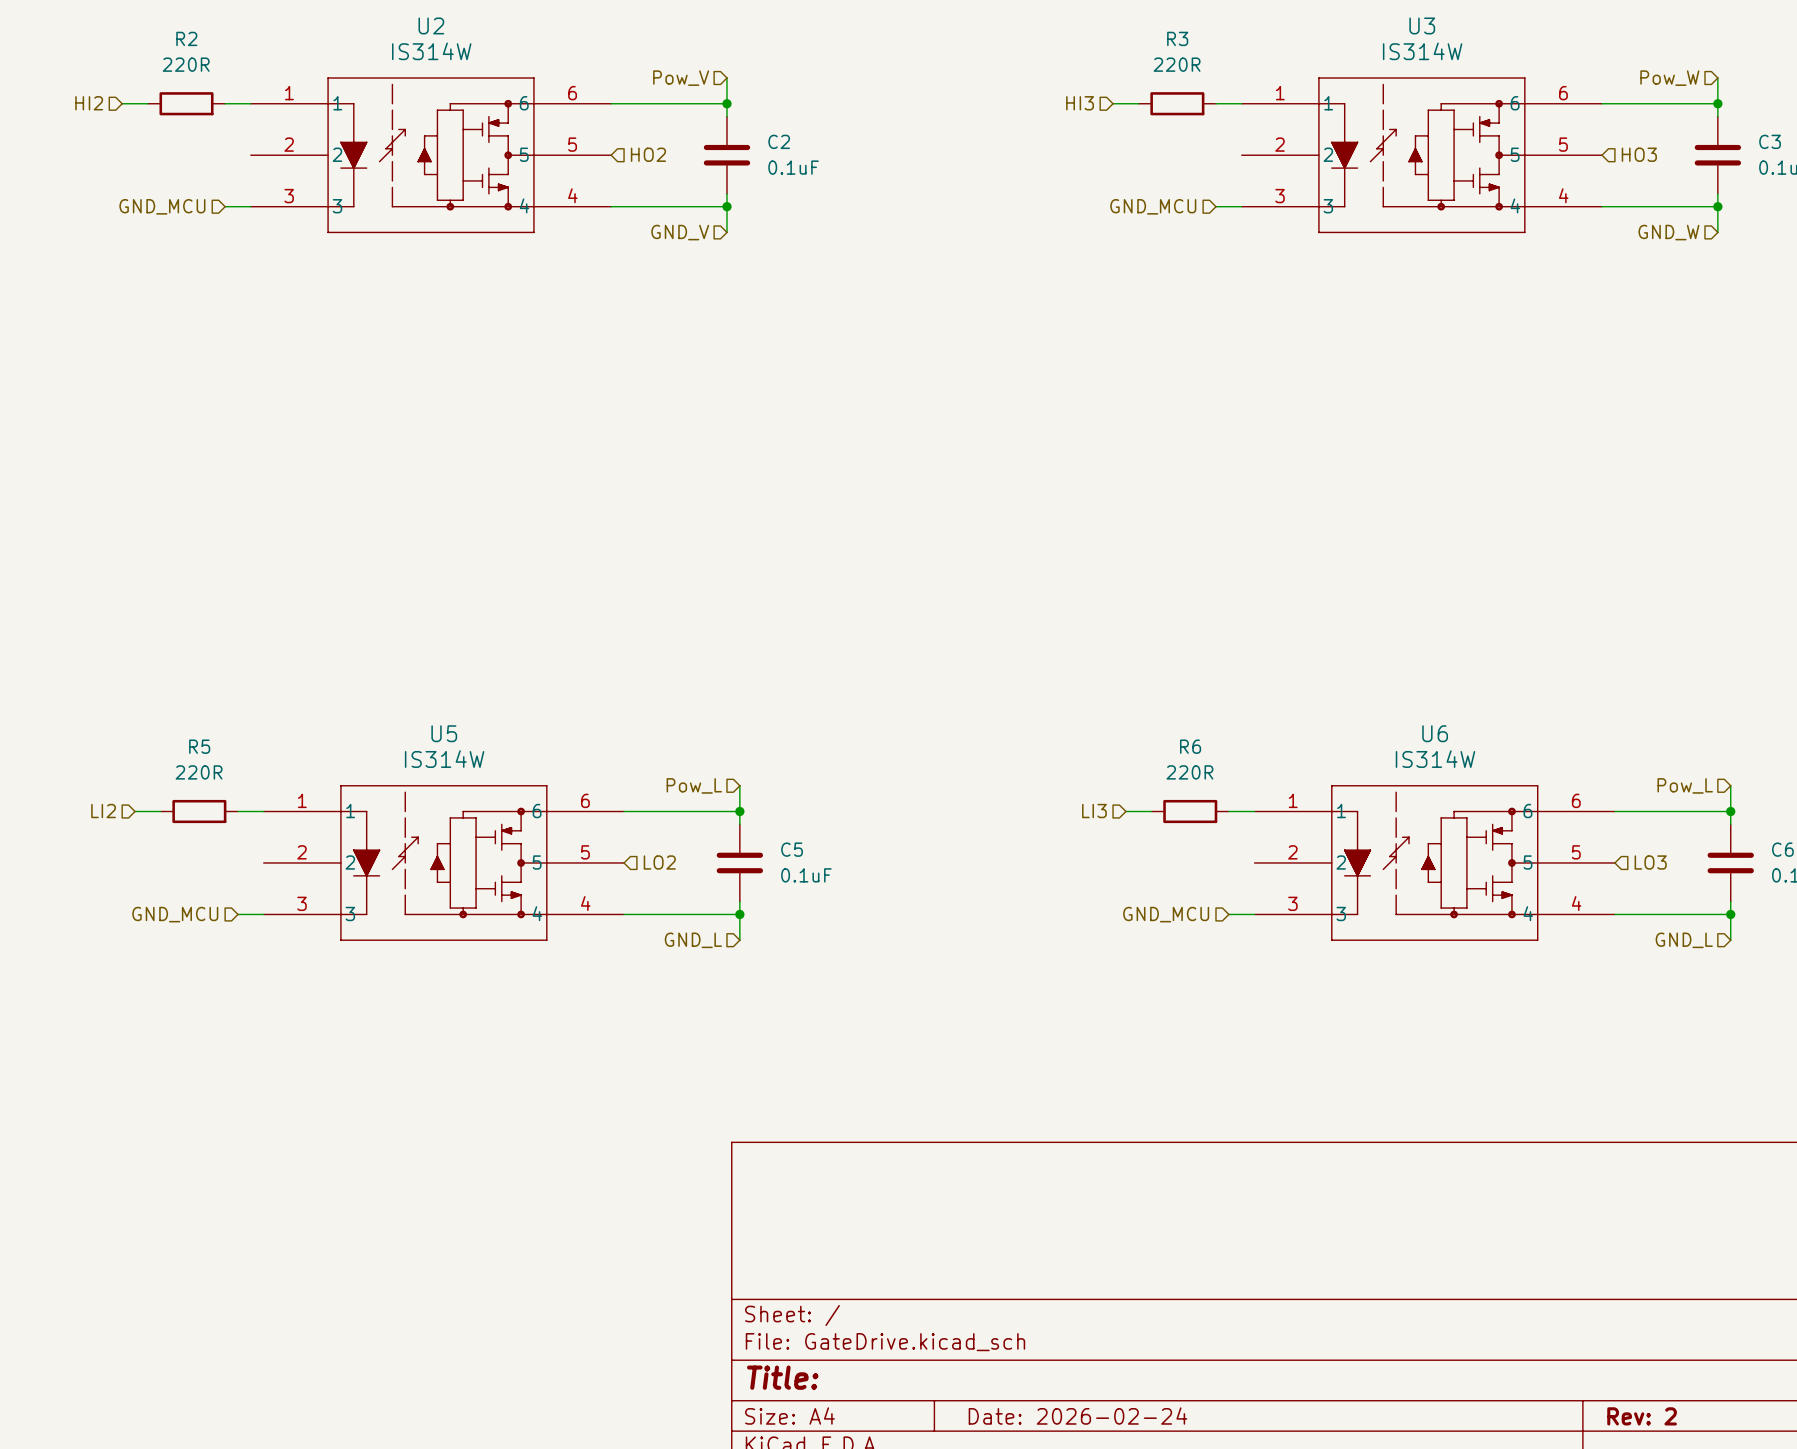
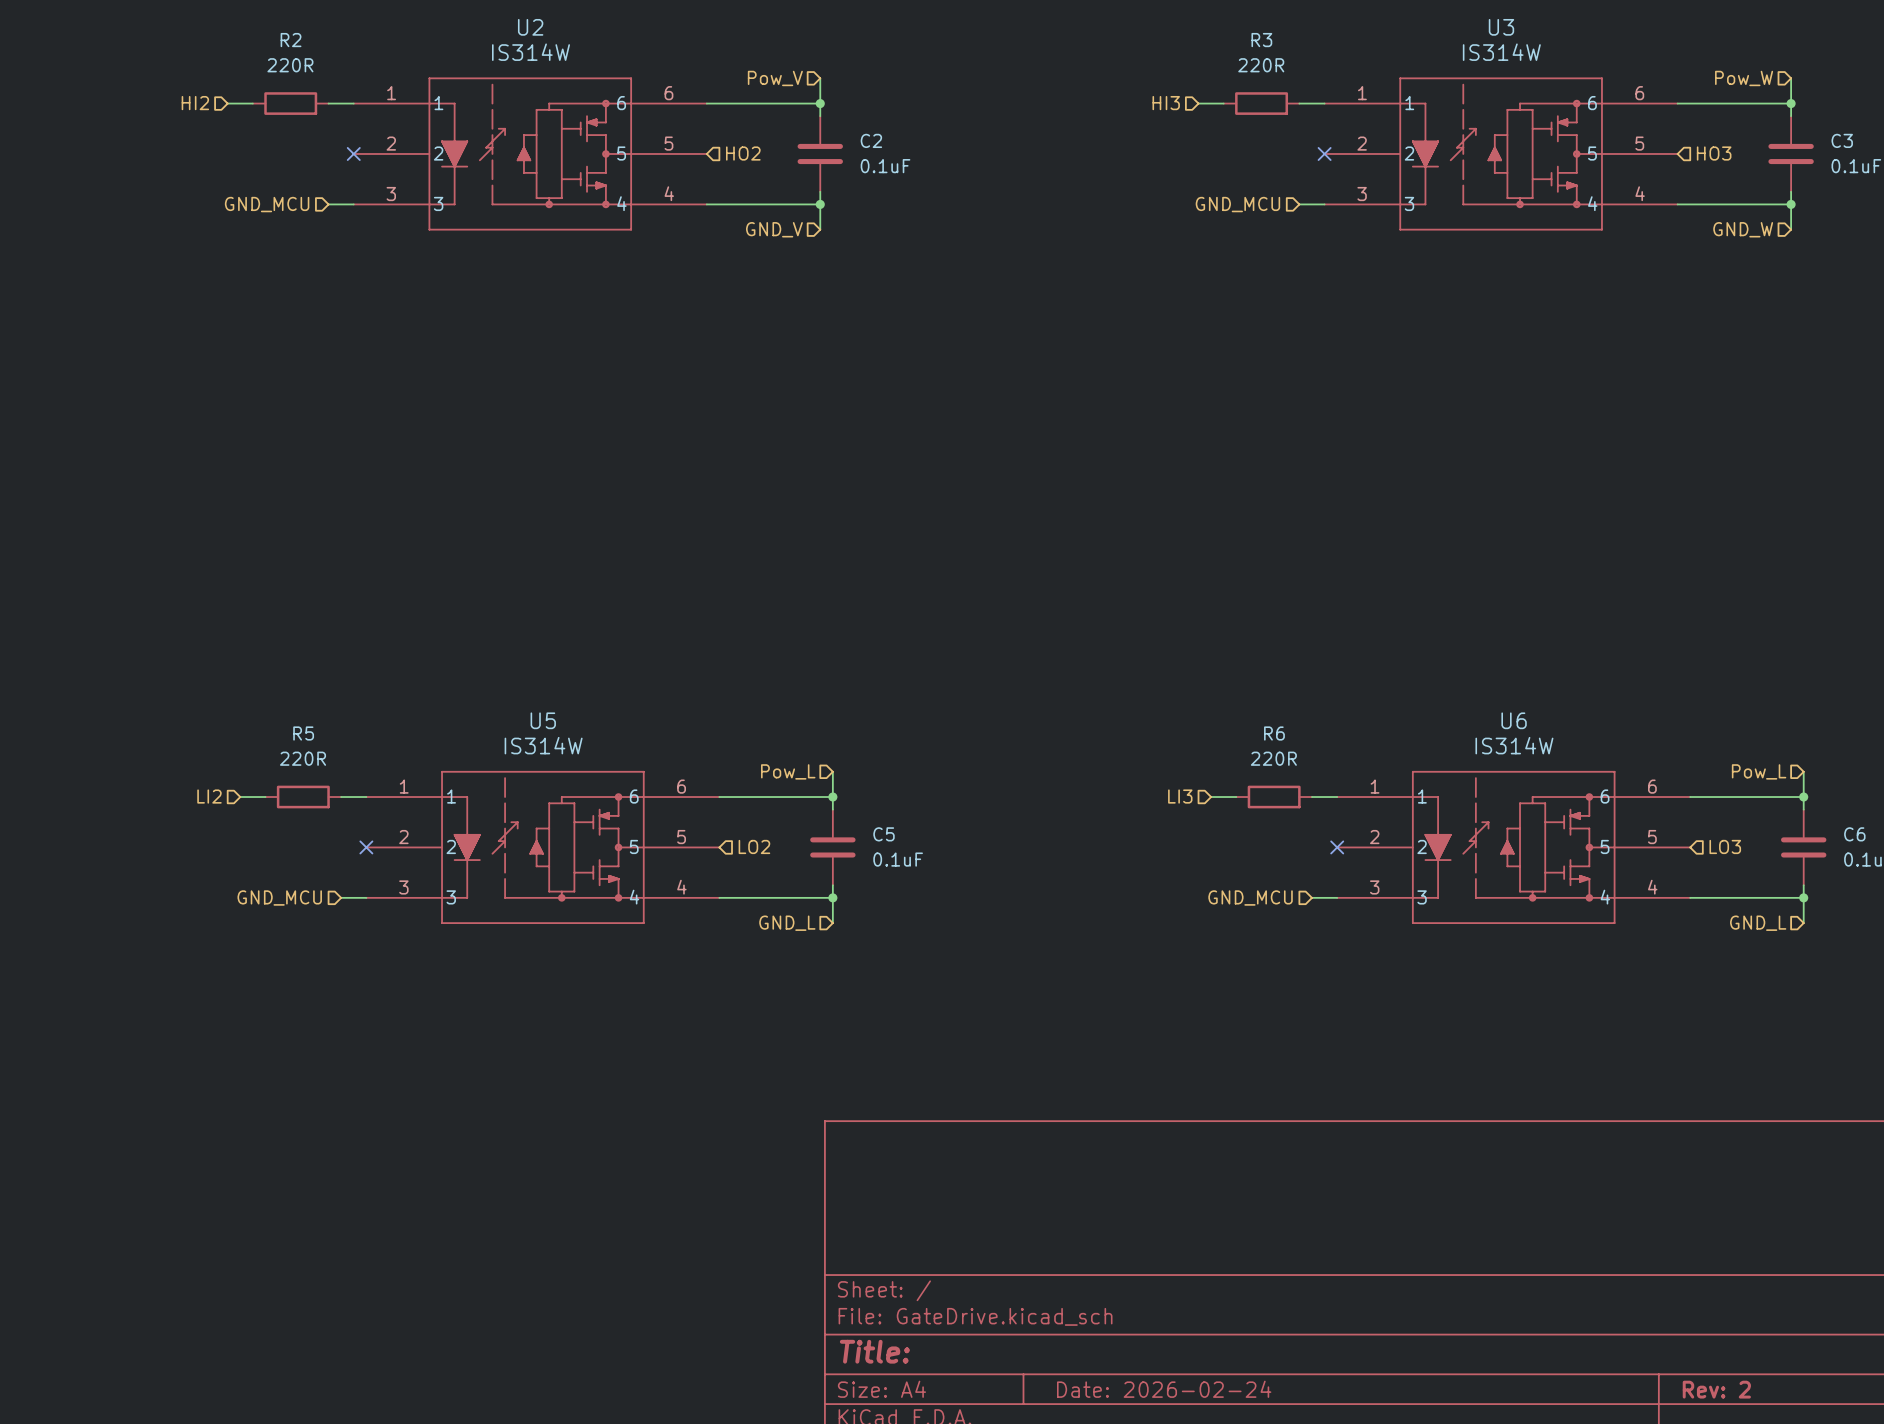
no-connect mark: none -> (353, 153)
no-connect mark: none -> (1324, 153)
no-connect mark: none -> (366, 847)
no-connect mark: none -> (1337, 847)

